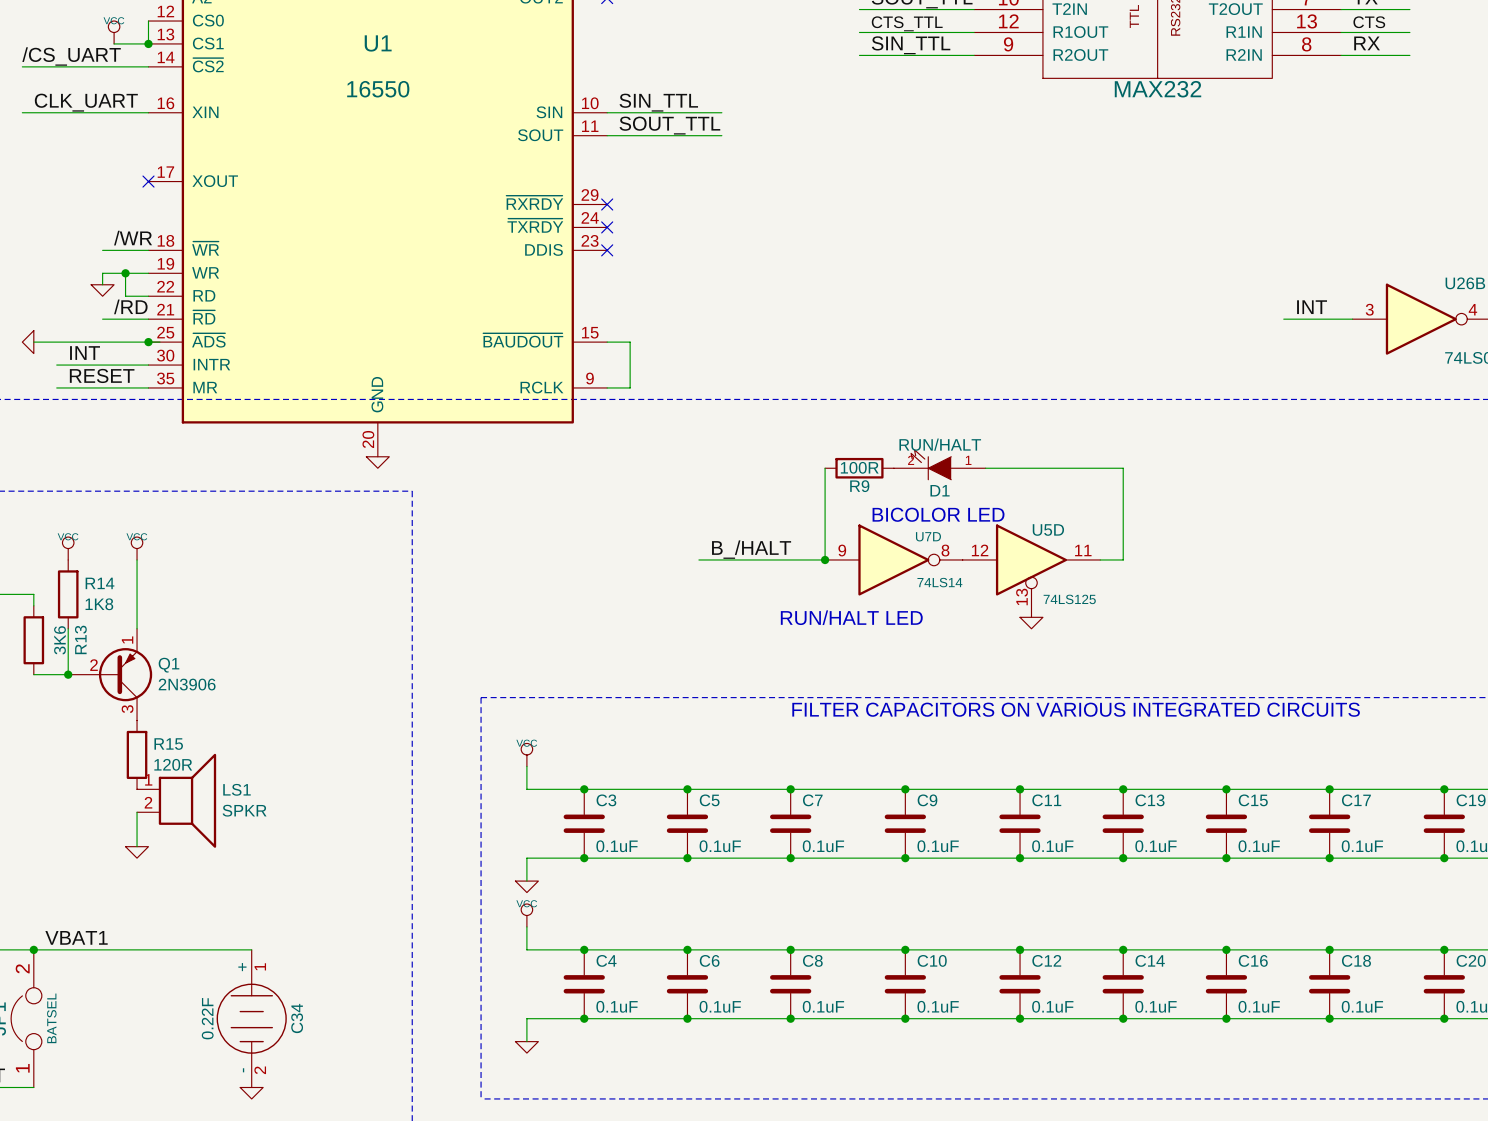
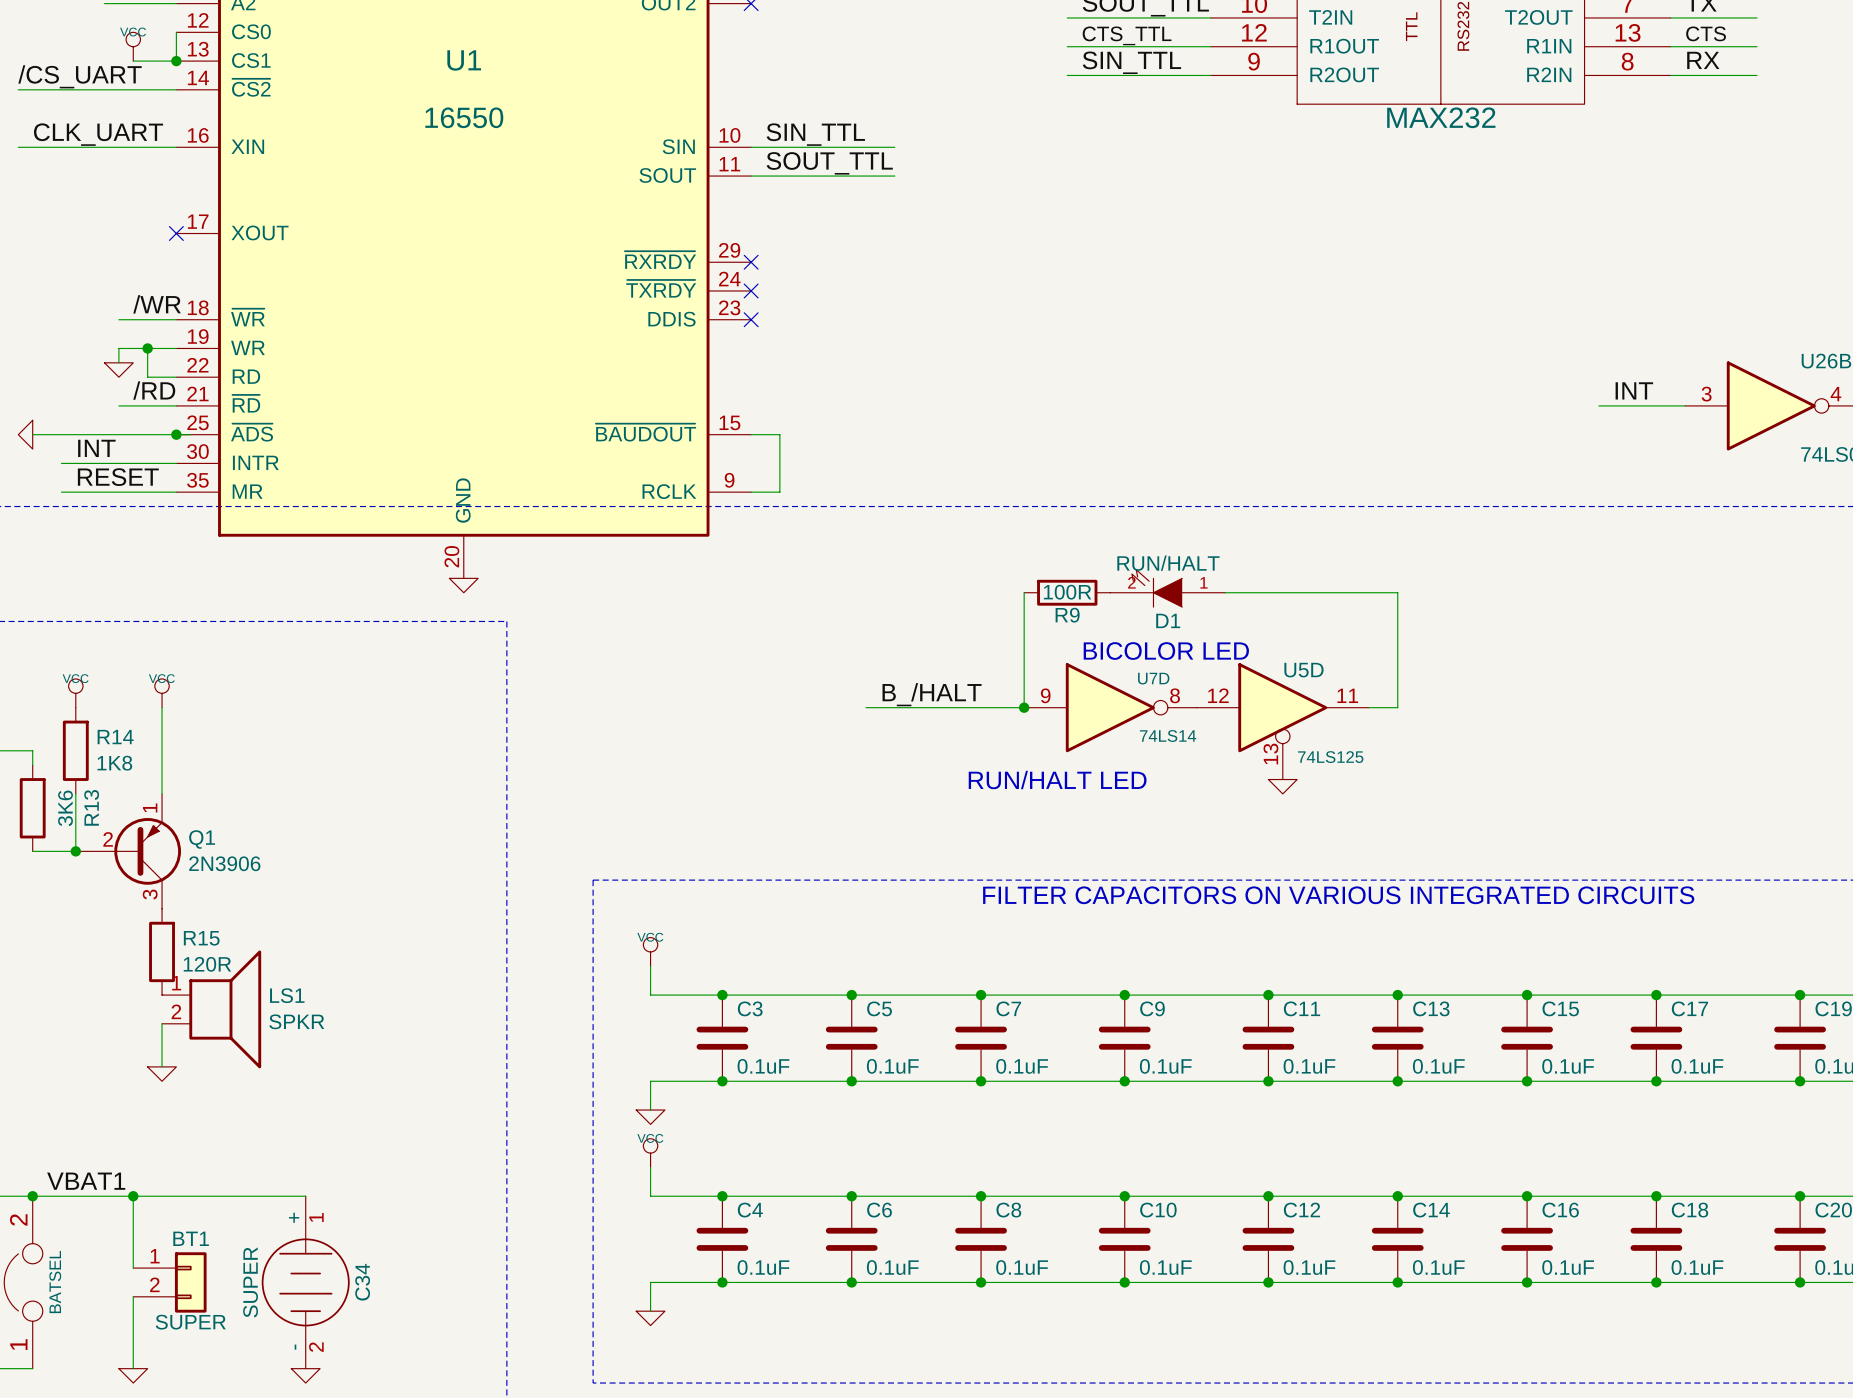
wire: none -> (133, 1196) (133, 1268)
junction: none -> (133, 1196)
BT1: none -> SUPER (169, 1282)
C34 value: 0.22F (207, 1018) -> SUPER (250, 1282)
wire: none -> (133, 1296) (133, 1368)
power symbol: none -> (133, 1375)

